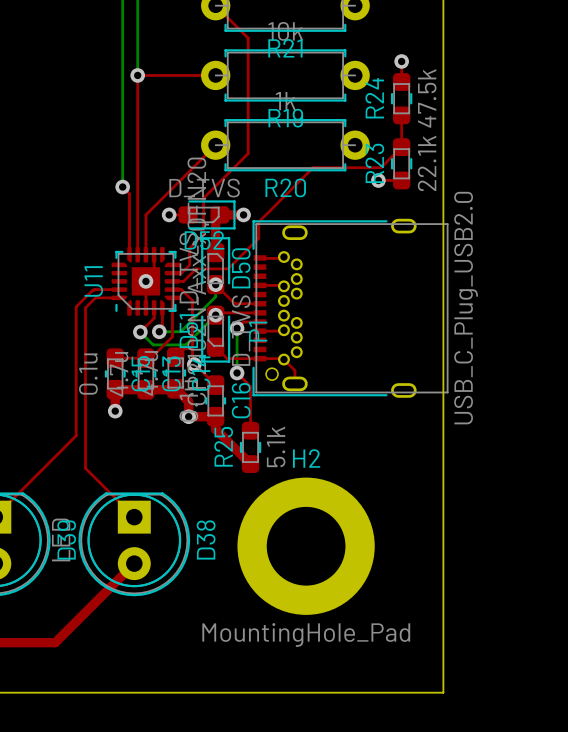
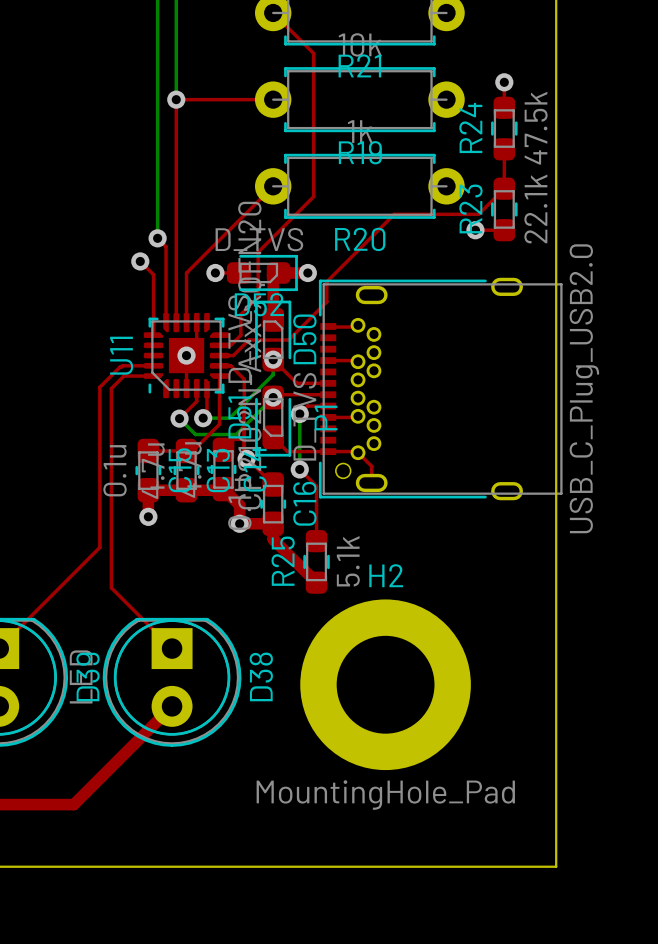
top track: none -> (140, 261) (153, 274) (153, 335)
via: none -> (140, 261)

